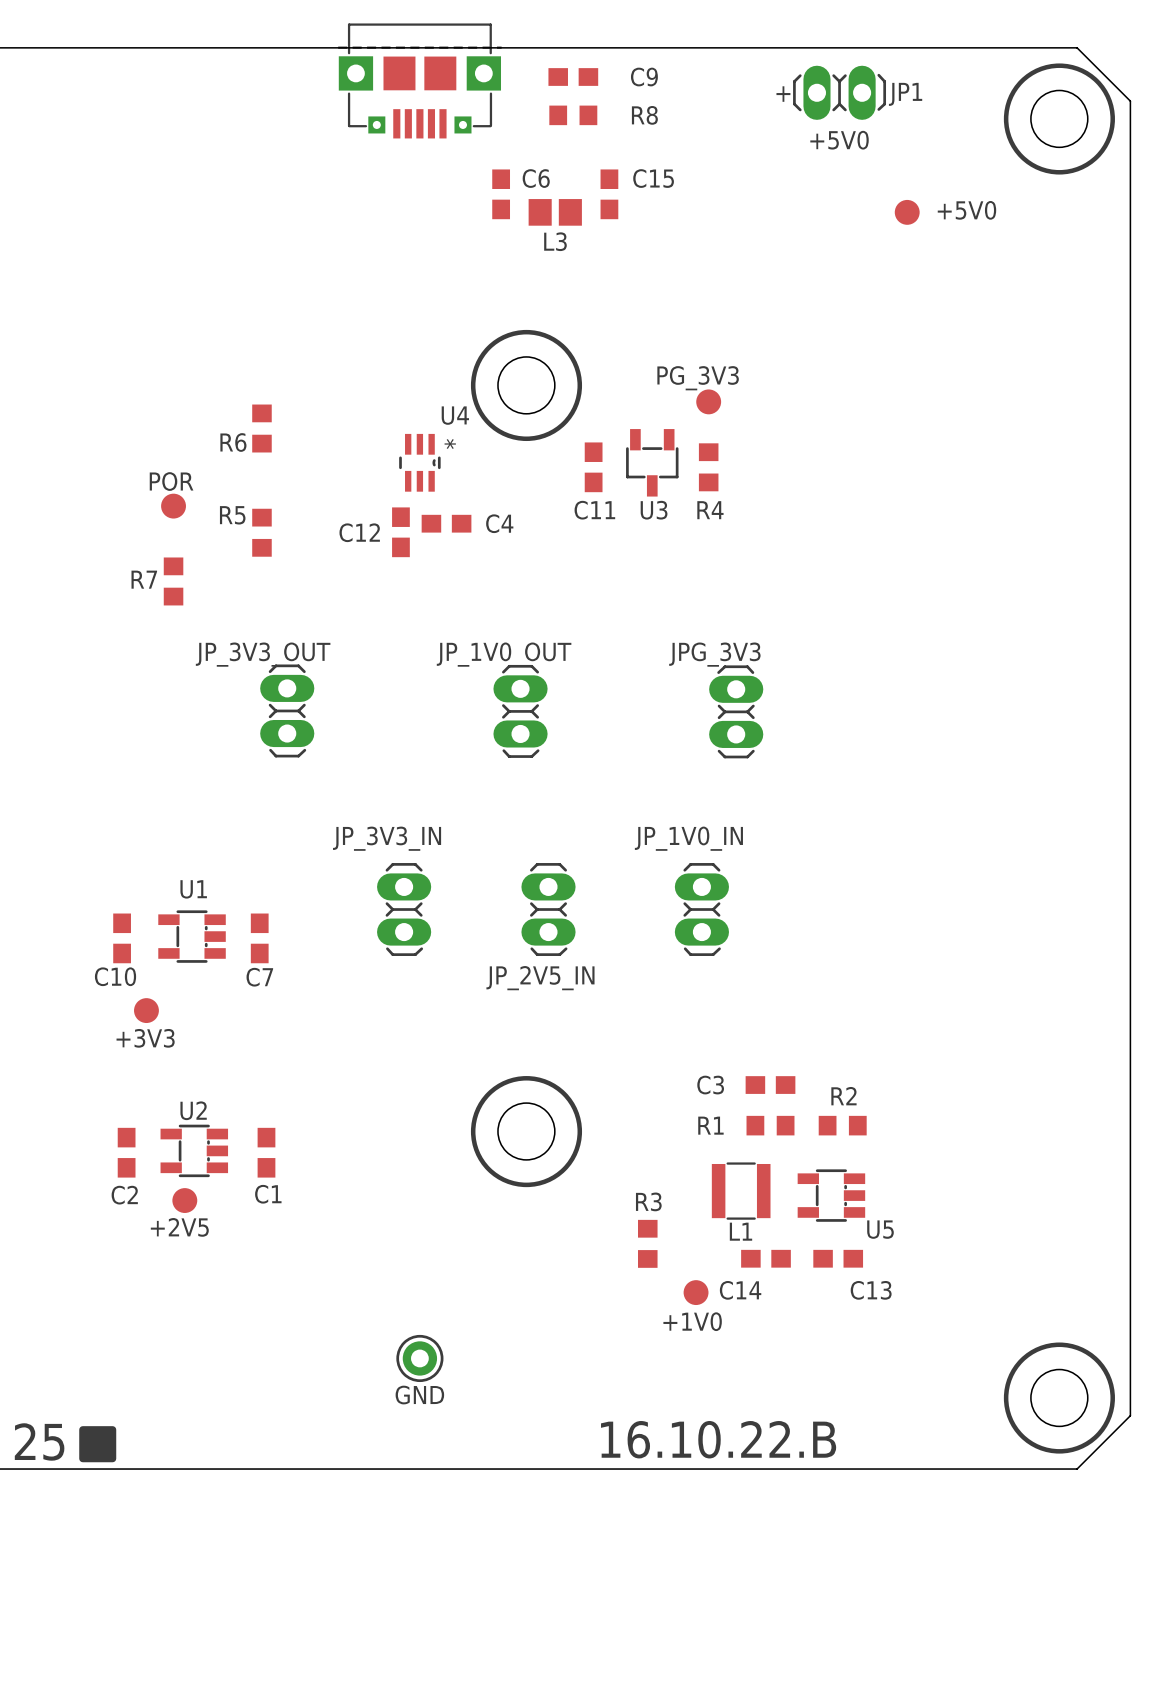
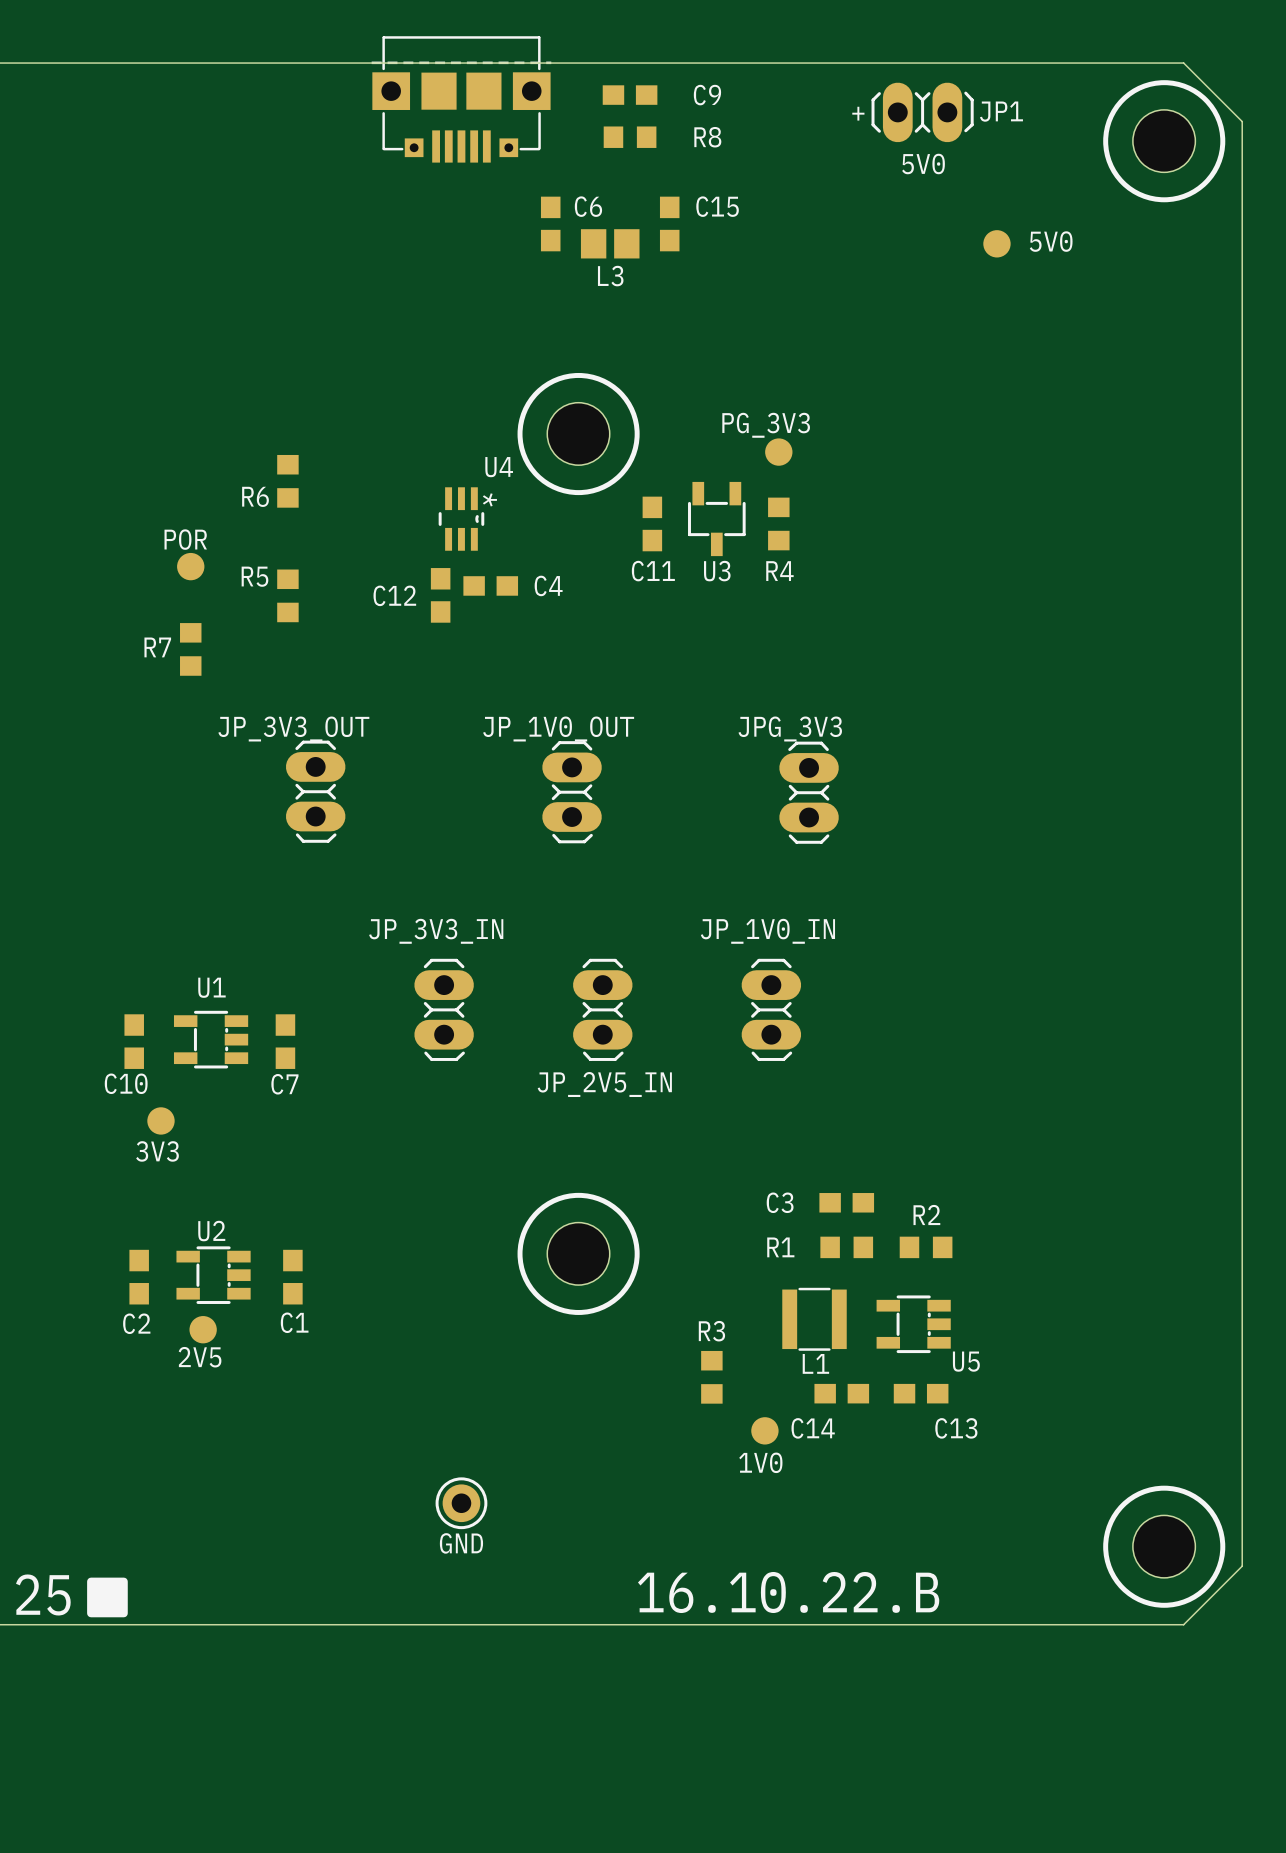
text: +5V0 (839, 140) -> 5V0 (923, 163)
+5V0 name: +5V0 (966, 210) -> 5V0 (1051, 241)
+3V3 name: +3V3 (145, 1038) -> 3V3 (157, 1151)
+2V5 name: +2V5 (179, 1227) -> 2V5 (200, 1357)
+1V0 name: +1V0 (692, 1321) -> 1V0 (760, 1462)

